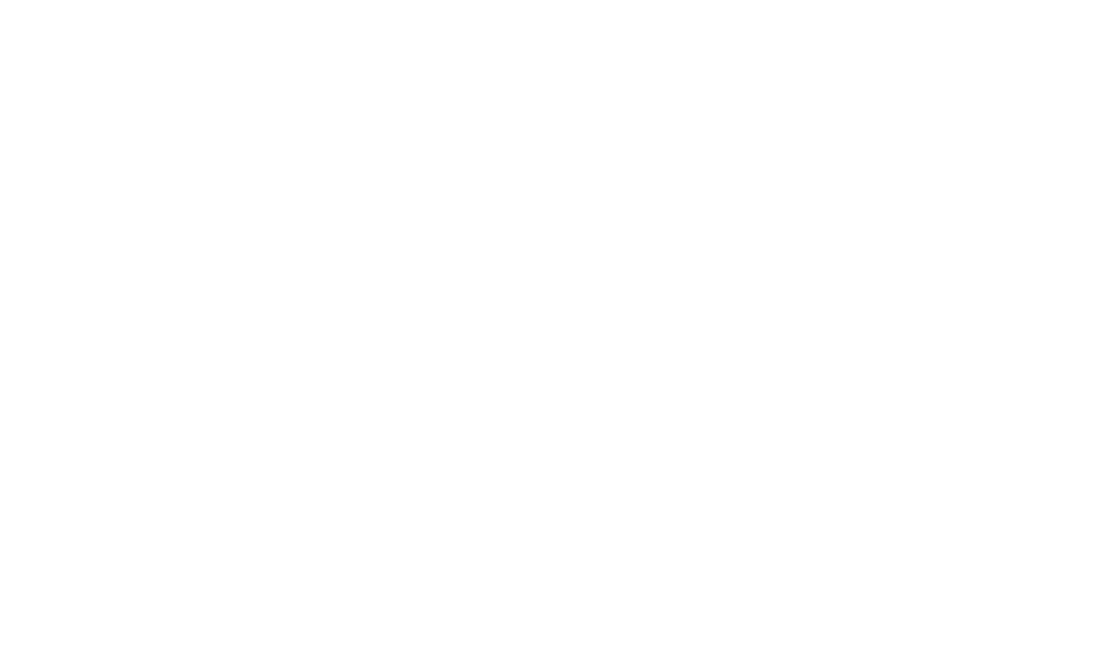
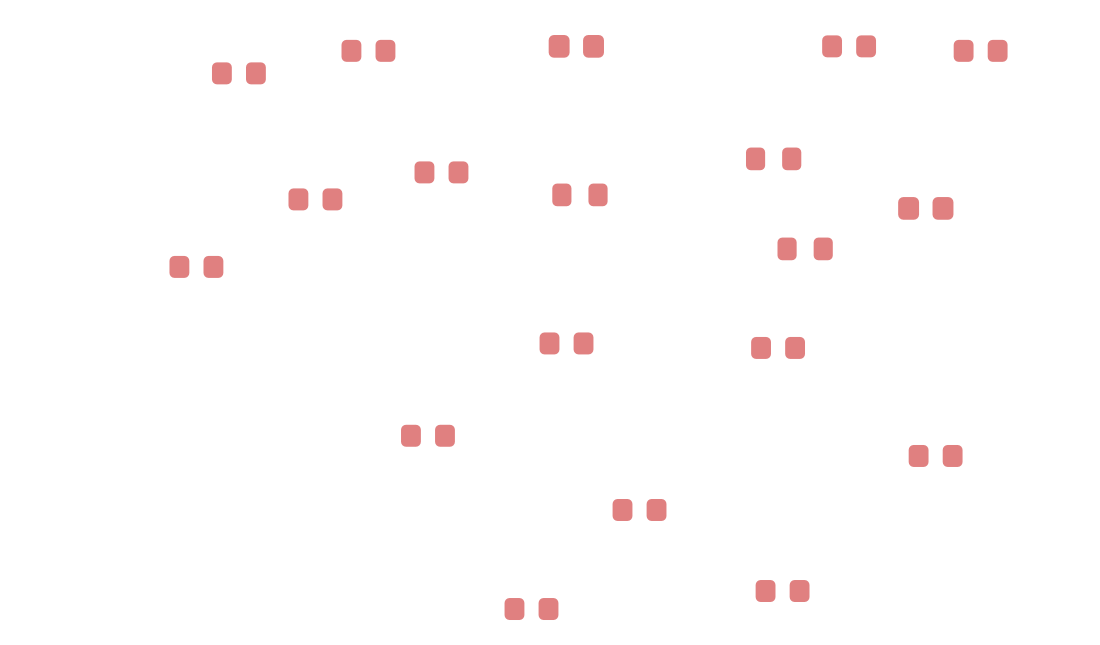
part: none -> (576, 46)
part: none -> (849, 46)
part: none -> (368, 50)
part: none -> (980, 50)
part: none -> (238, 73)
part: none -> (773, 158)
part: none -> (441, 172)
part: none -> (579, 194)
part: none -> (315, 199)
part: none -> (925, 208)
part: none -> (805, 248)
part: none -> (196, 266)
part: none -> (566, 343)
part: none -> (778, 347)
part: none -> (427, 435)
part: none -> (935, 455)
part: none -> (639, 509)
part: none -> (782, 591)
part: none -> (531, 609)

